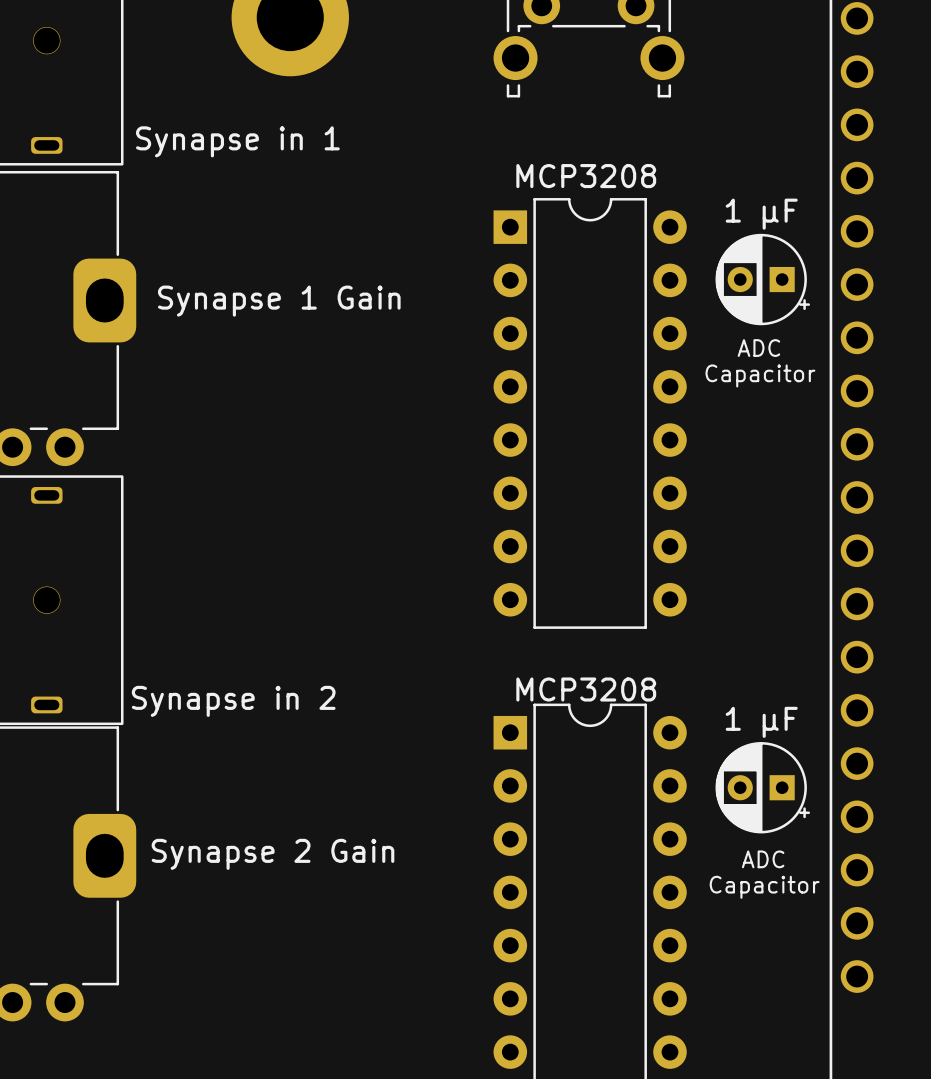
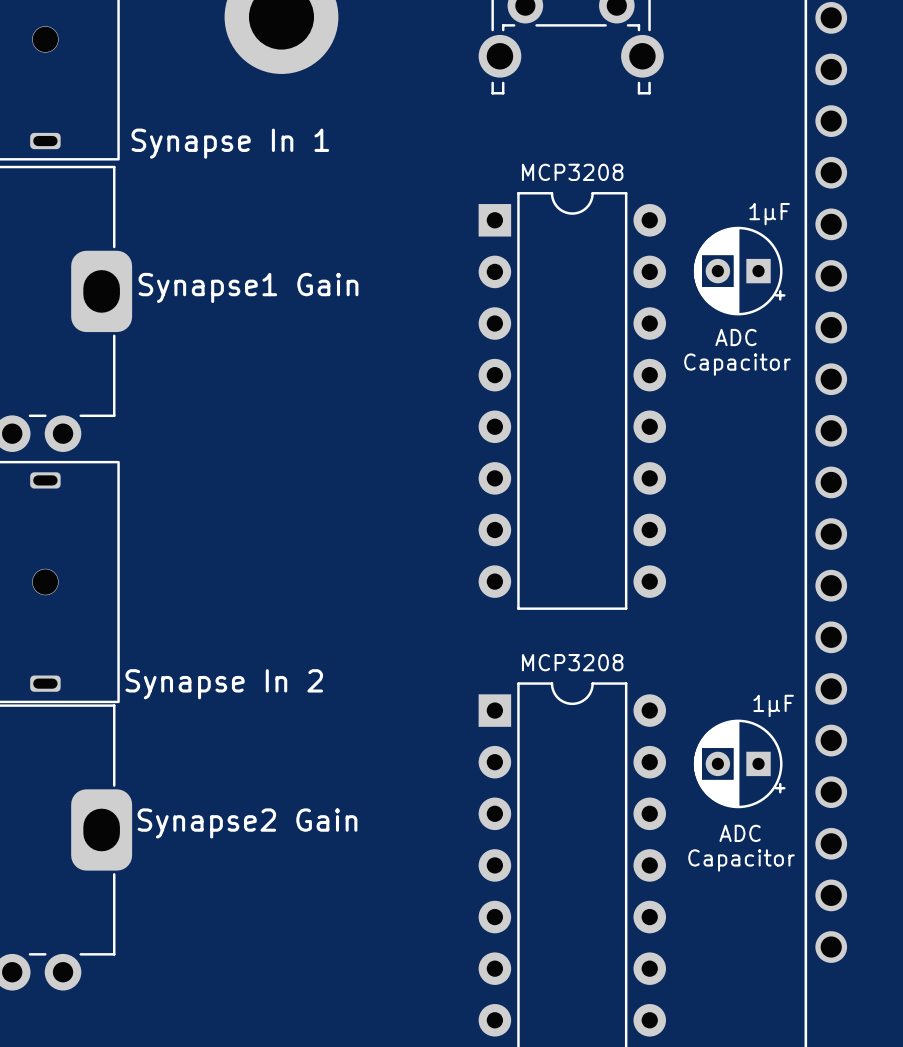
Synapse In 1 value: Synapse in 1 (237, 141) -> none
Synapse In 1 name: none -> Synapse In 1 (230, 143)
MCP3208 value: MCP3208 (586, 176) -> none
MCP3208 name: none -> MCP3208 (572, 172)
1μF value: 1 μF (761, 214) -> none
1μF name: none -> 1μF (769, 214)
Synapse1 Gain name: none -> Synapse1 Gain (248, 287)
Synapse1 Gain value: Synapse 1 Gain (279, 301) -> none
MCP3208 name: none -> MCP3208 (572, 662)
MCP3208 value: MCP3208 (586, 689) -> none
Synapse In 2 value: Synapse in 2 (233, 701) -> none
Synapse In 2 name: none -> Synapse In 2 (224, 684)
1μF value: 1 μF (761, 722) -> none
1μF name: none -> 1μF (773, 705)
Synapse2 Gain name: none -> Synapse2 Gain (247, 823)
Synapse2 Gain value: Synapse 2 Gain (273, 854) -> none

